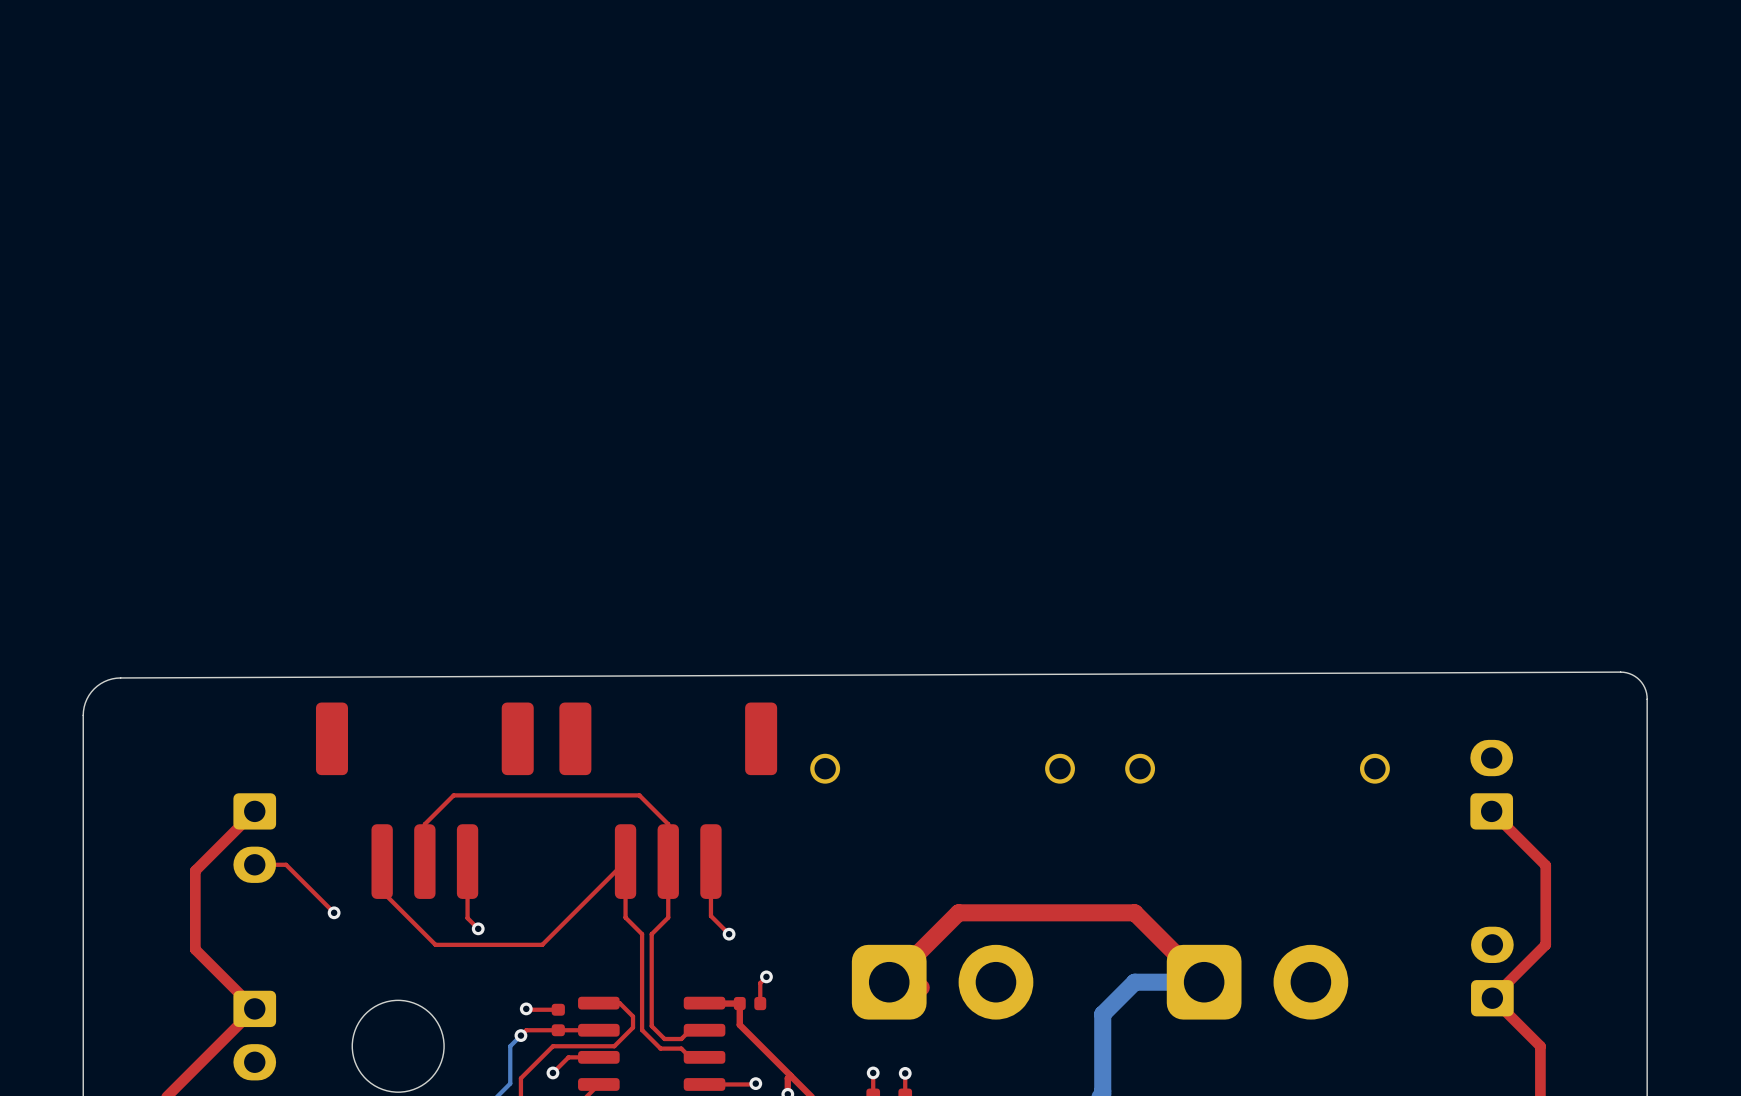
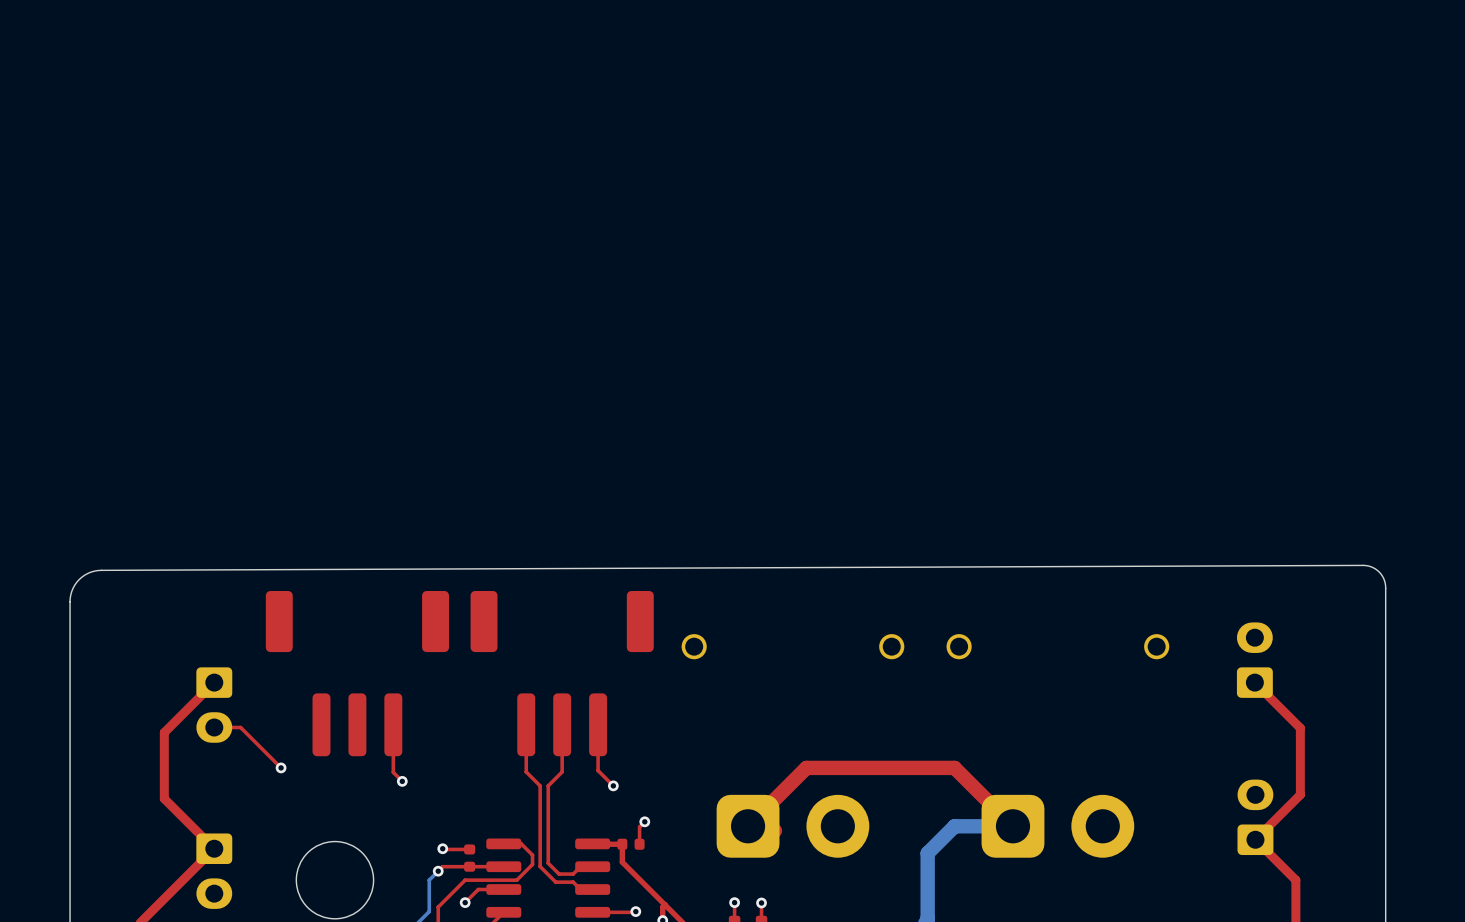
top track: (625, 861) (542, 944) (435, 944) (382, 891) (382, 861) -> none
top track: (668, 861) (668, 824) (639, 795) (453, 795) (424, 824) (424, 861) -> none

